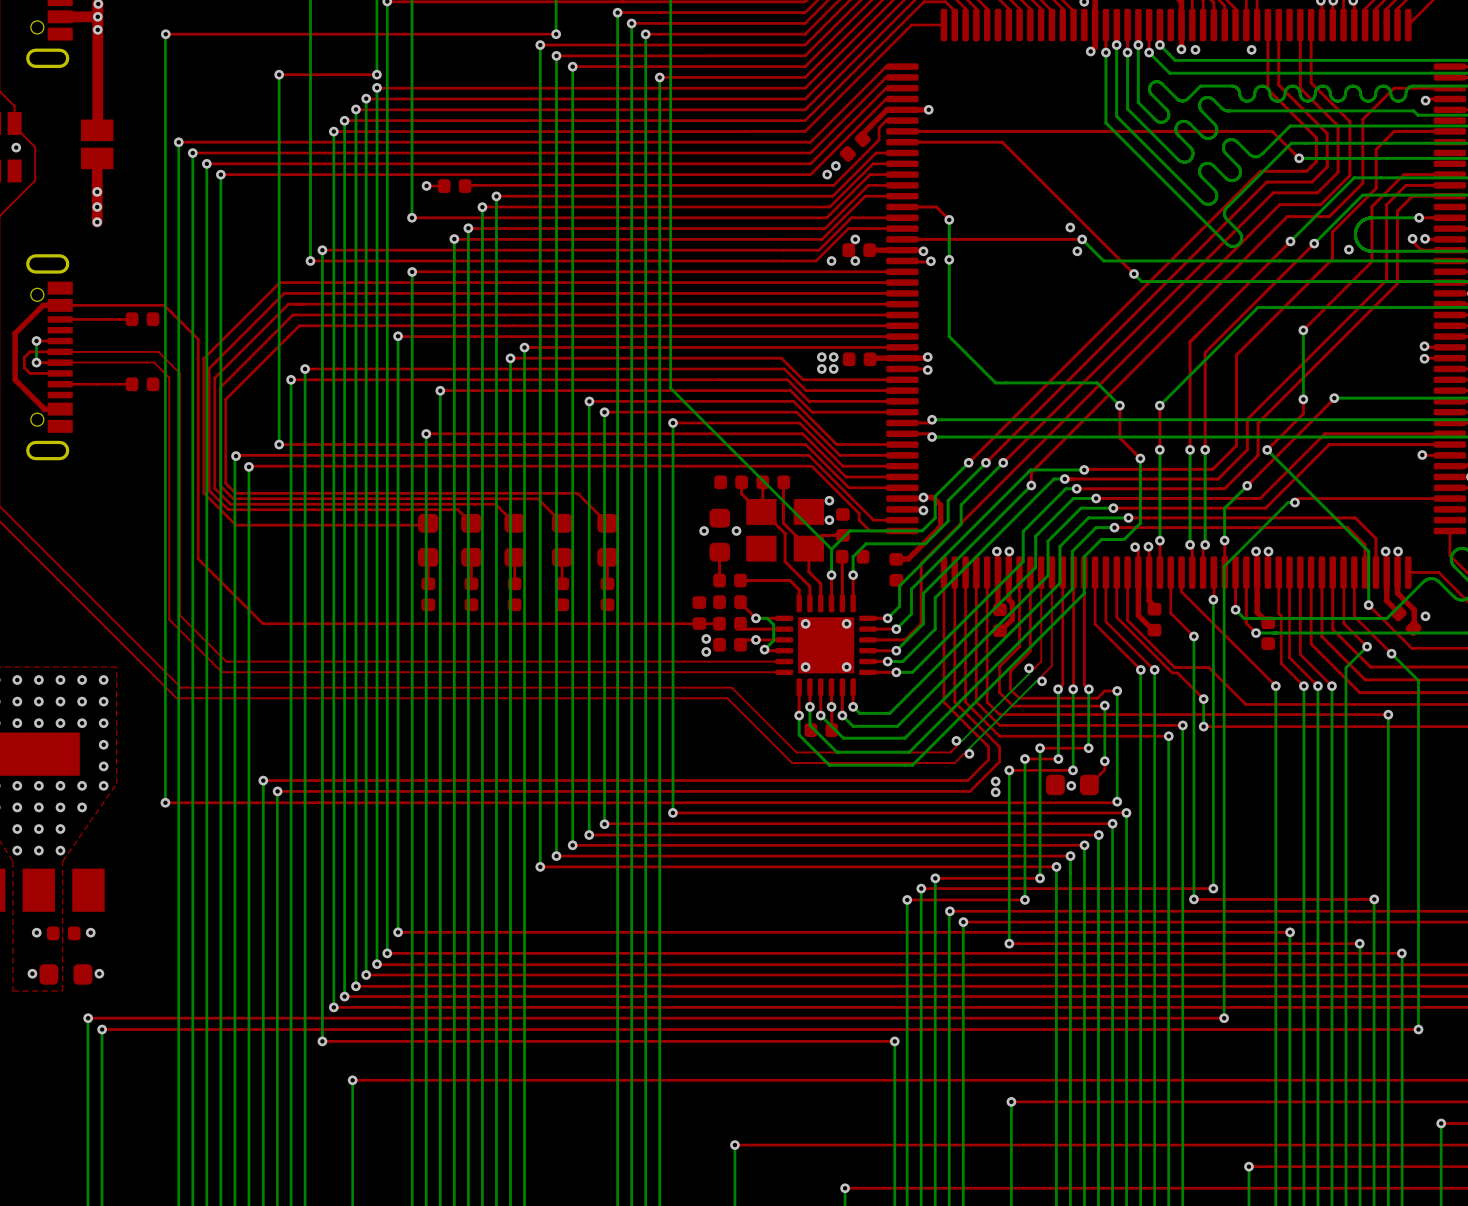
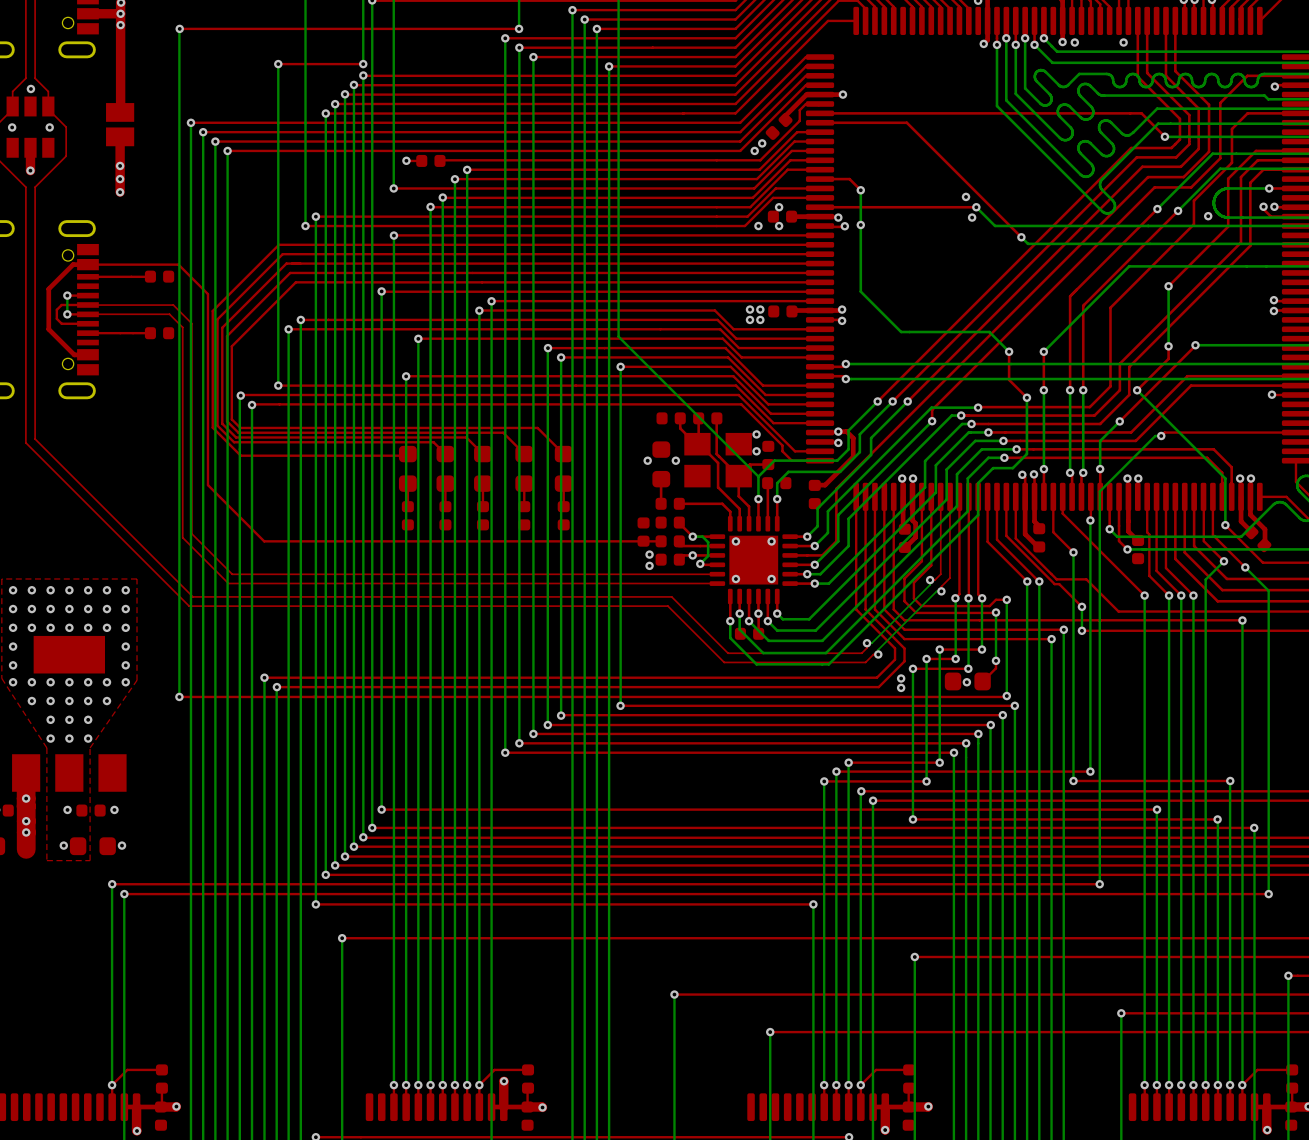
via: (1425, 616) -> none

